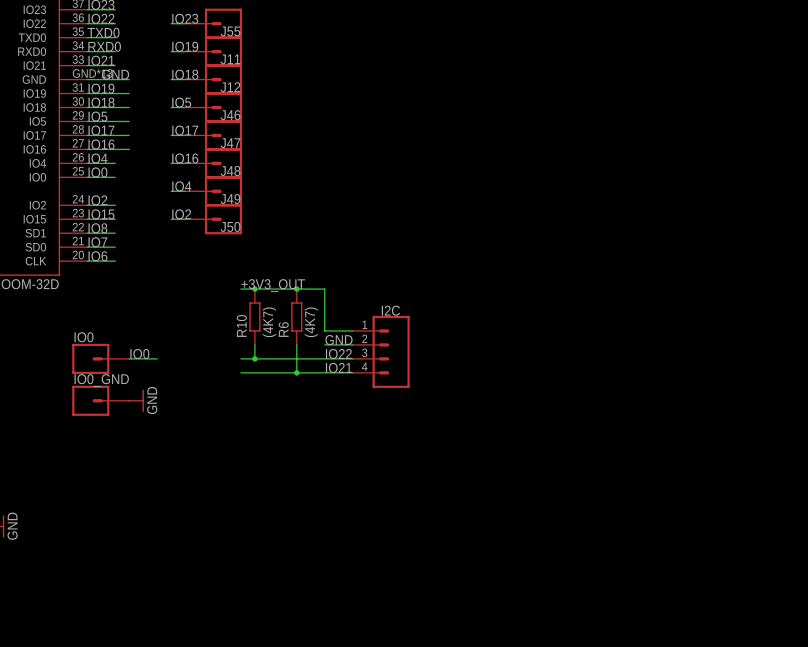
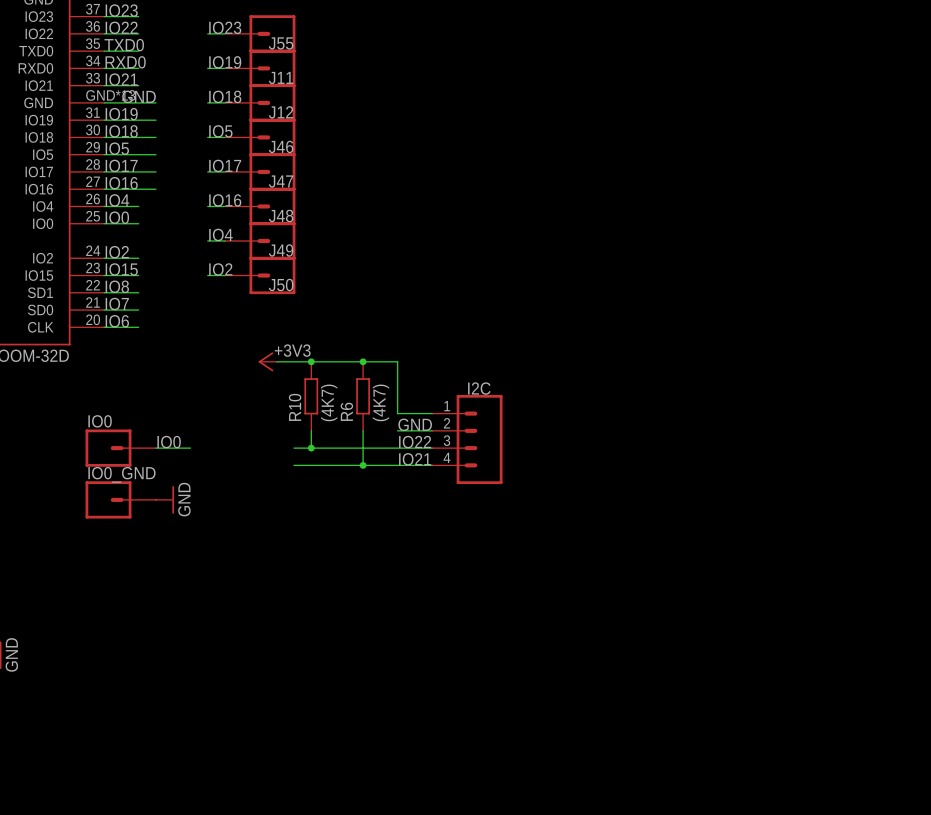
label: +3V3_OUT (273, 285) -> none
power symbol: none -> +3V3 (267, 361)
wire: none -> (276, 361) (294, 361)

